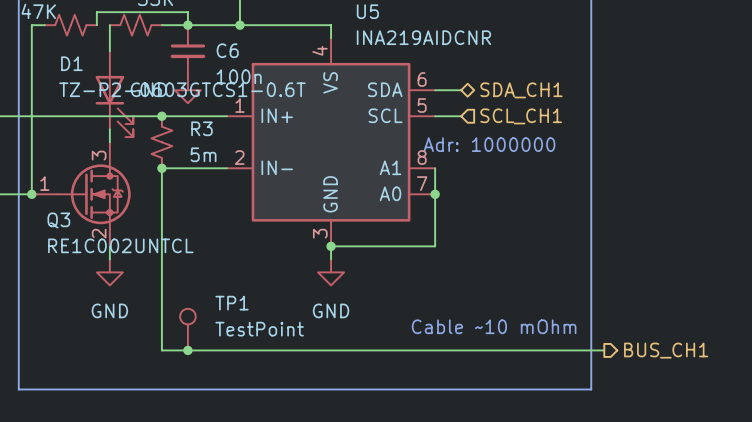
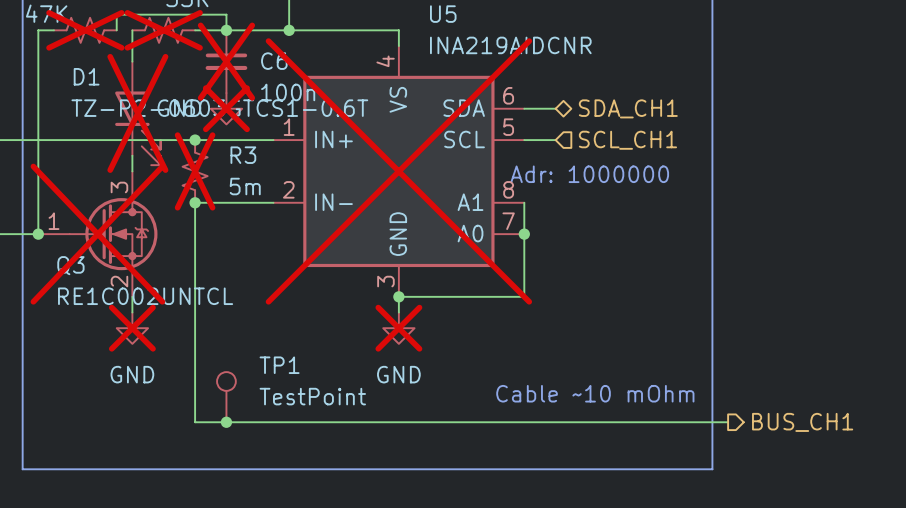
part do-not-place cross: none -> (85, 30)
part do-not-place cross: none -> (163, 30)
C6 do-not-place cross: none -> (226, 61)
power symbol do-not-place cross: none -> (226, 108)
D1 do-not-place cross: none -> (137, 113)
R3 do-not-place cross: none -> (195, 171)
U5 do-not-place cross: none -> (398, 171)
Q3 do-not-place cross: none -> (97, 234)
power symbol do-not-place cross: none -> (132, 328)
power symbol do-not-place cross: none -> (398, 328)

